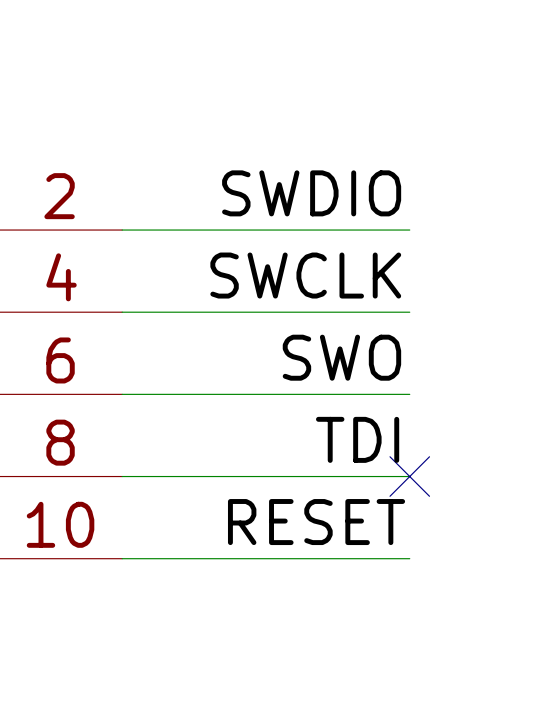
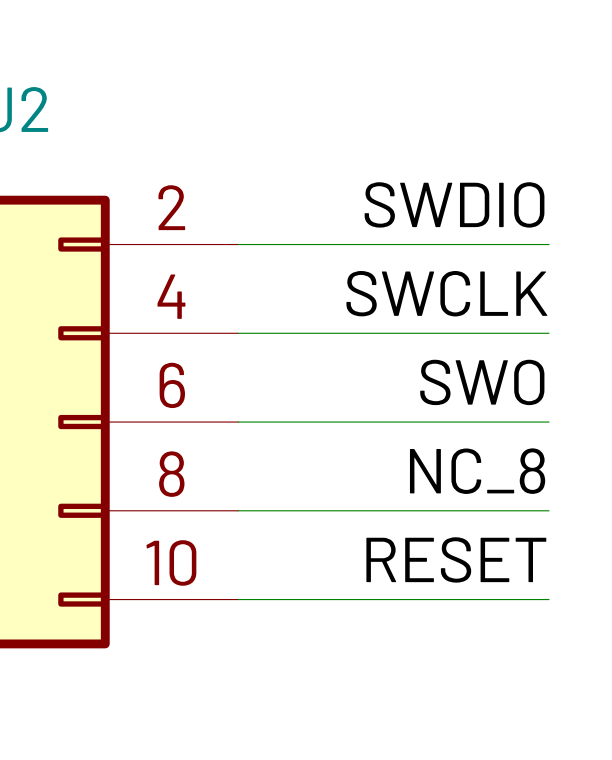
label: TDI (357, 439) -> NC_8 (477, 471)
no-connect mark: (409, 476) -> none

